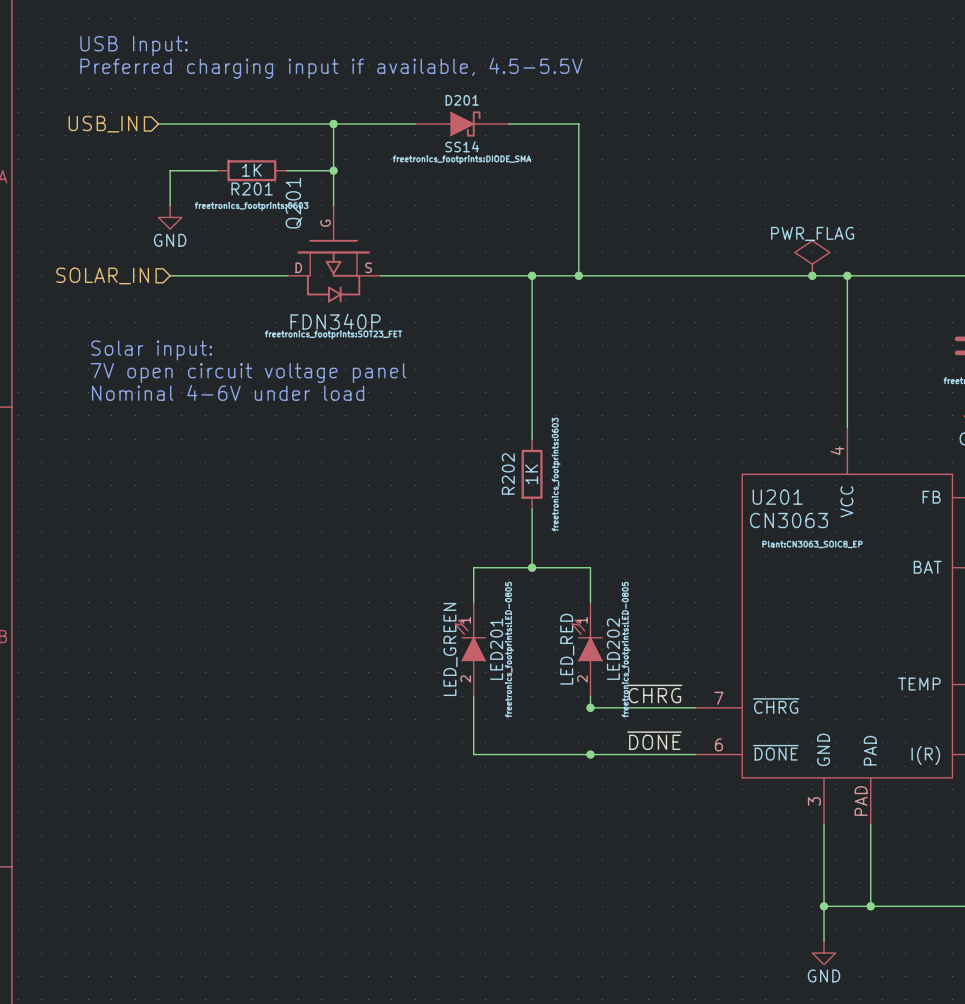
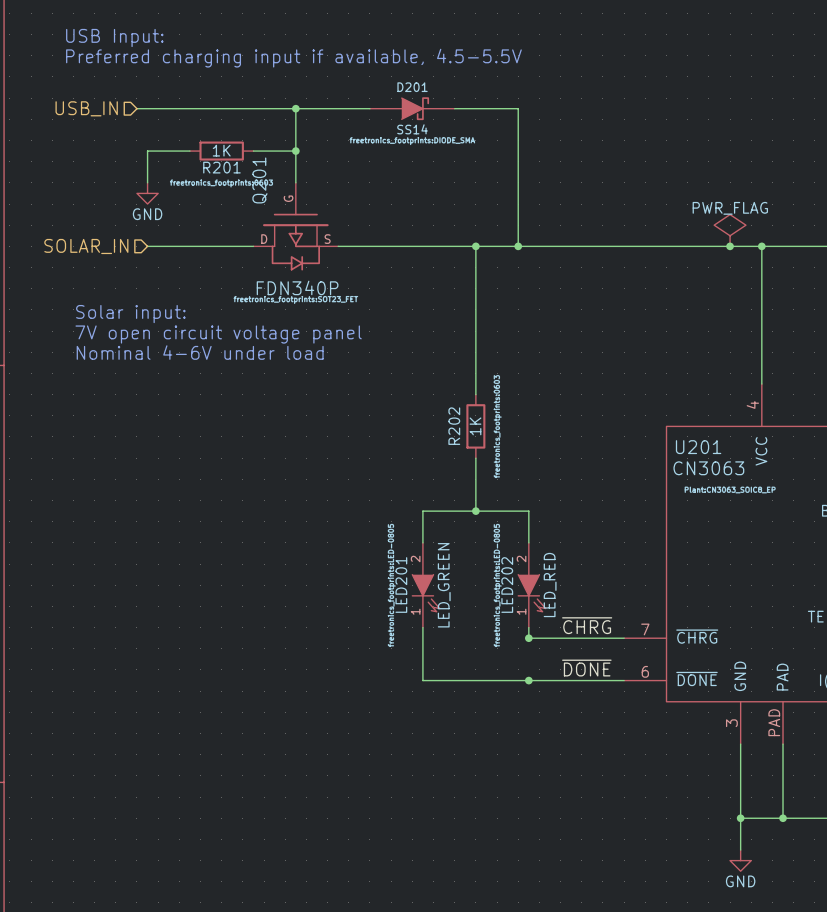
LED201 rotation: 0° (470, 640) -> 180° (426, 593)
LED202 rotation: 0° (586, 640) -> 180° (532, 593)

